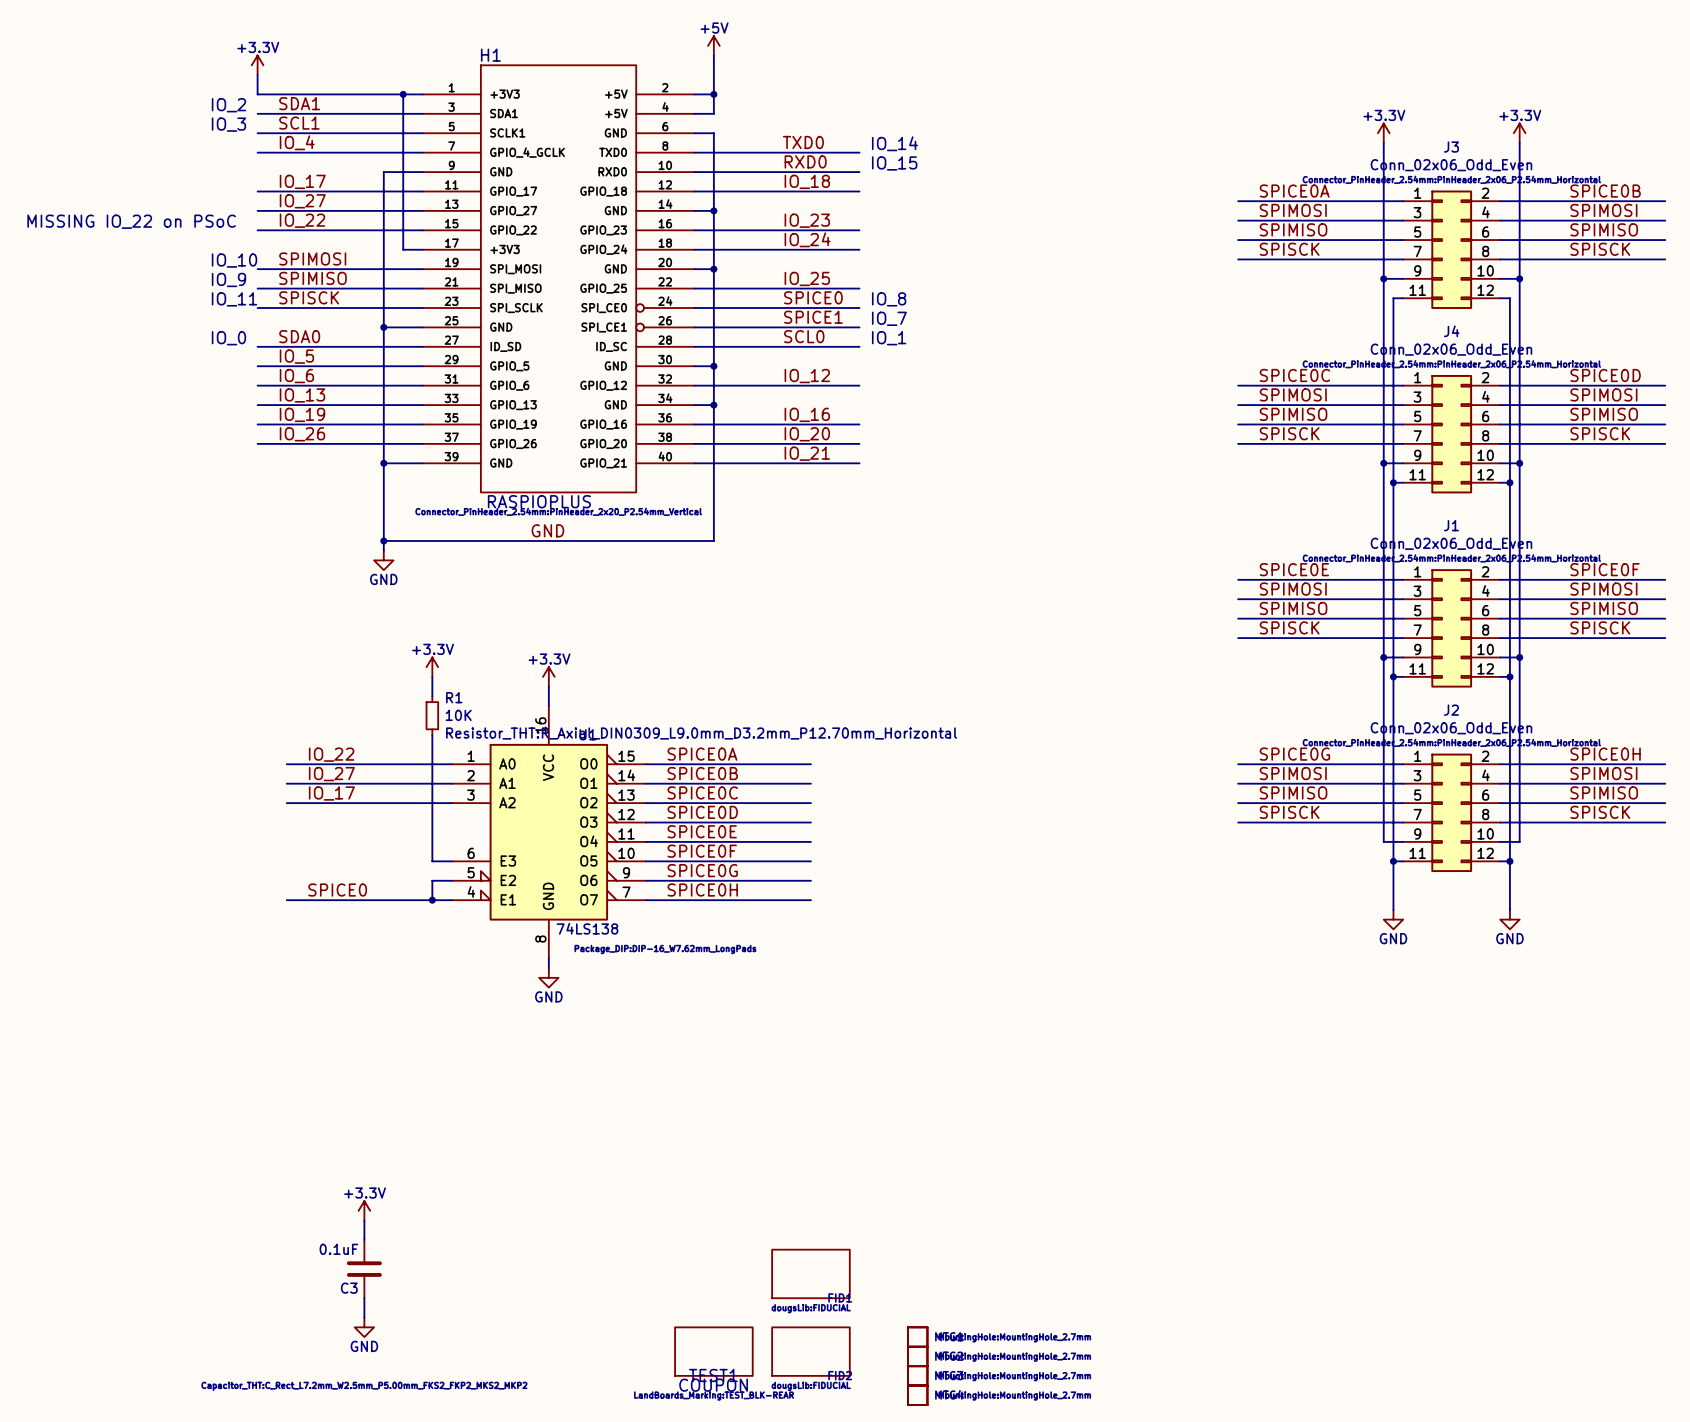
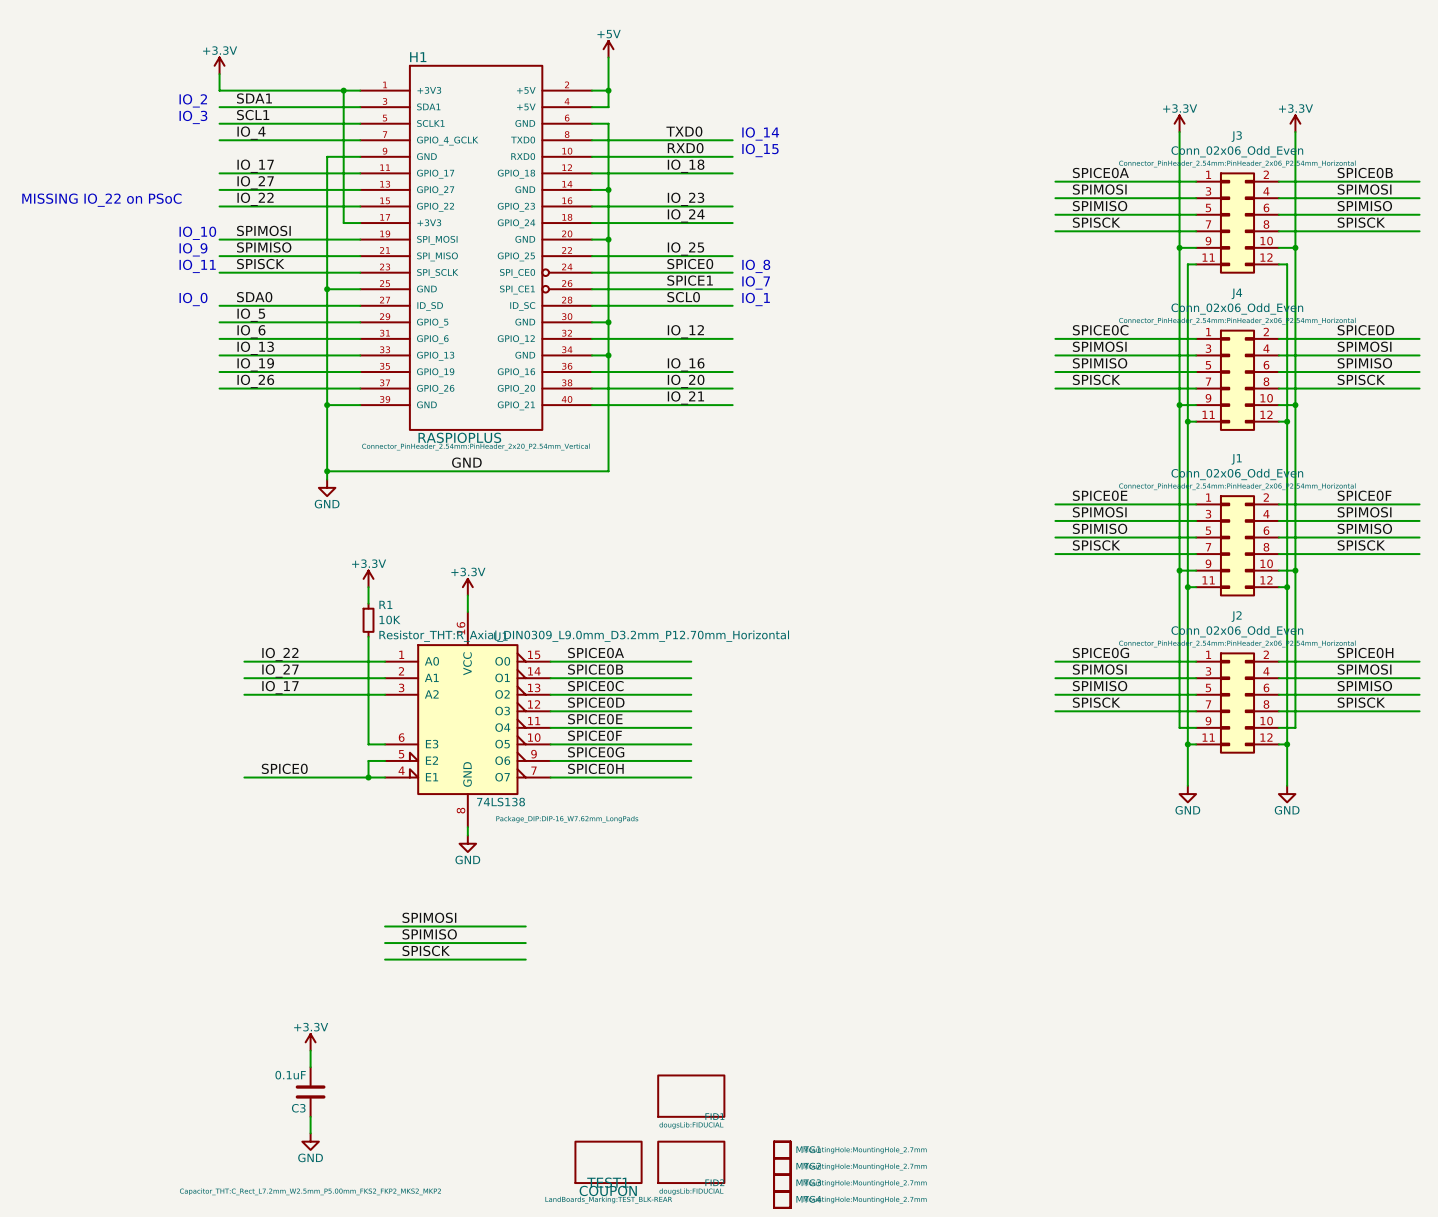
label: none -> SPIMOSI (429, 917)
wire: none -> (385, 926) (525, 926)
label: none -> SPIMISO (429, 934)
wire: none -> (385, 943) (525, 943)
label: none -> SPISCK (426, 950)
wire: none -> (385, 959) (525, 959)

